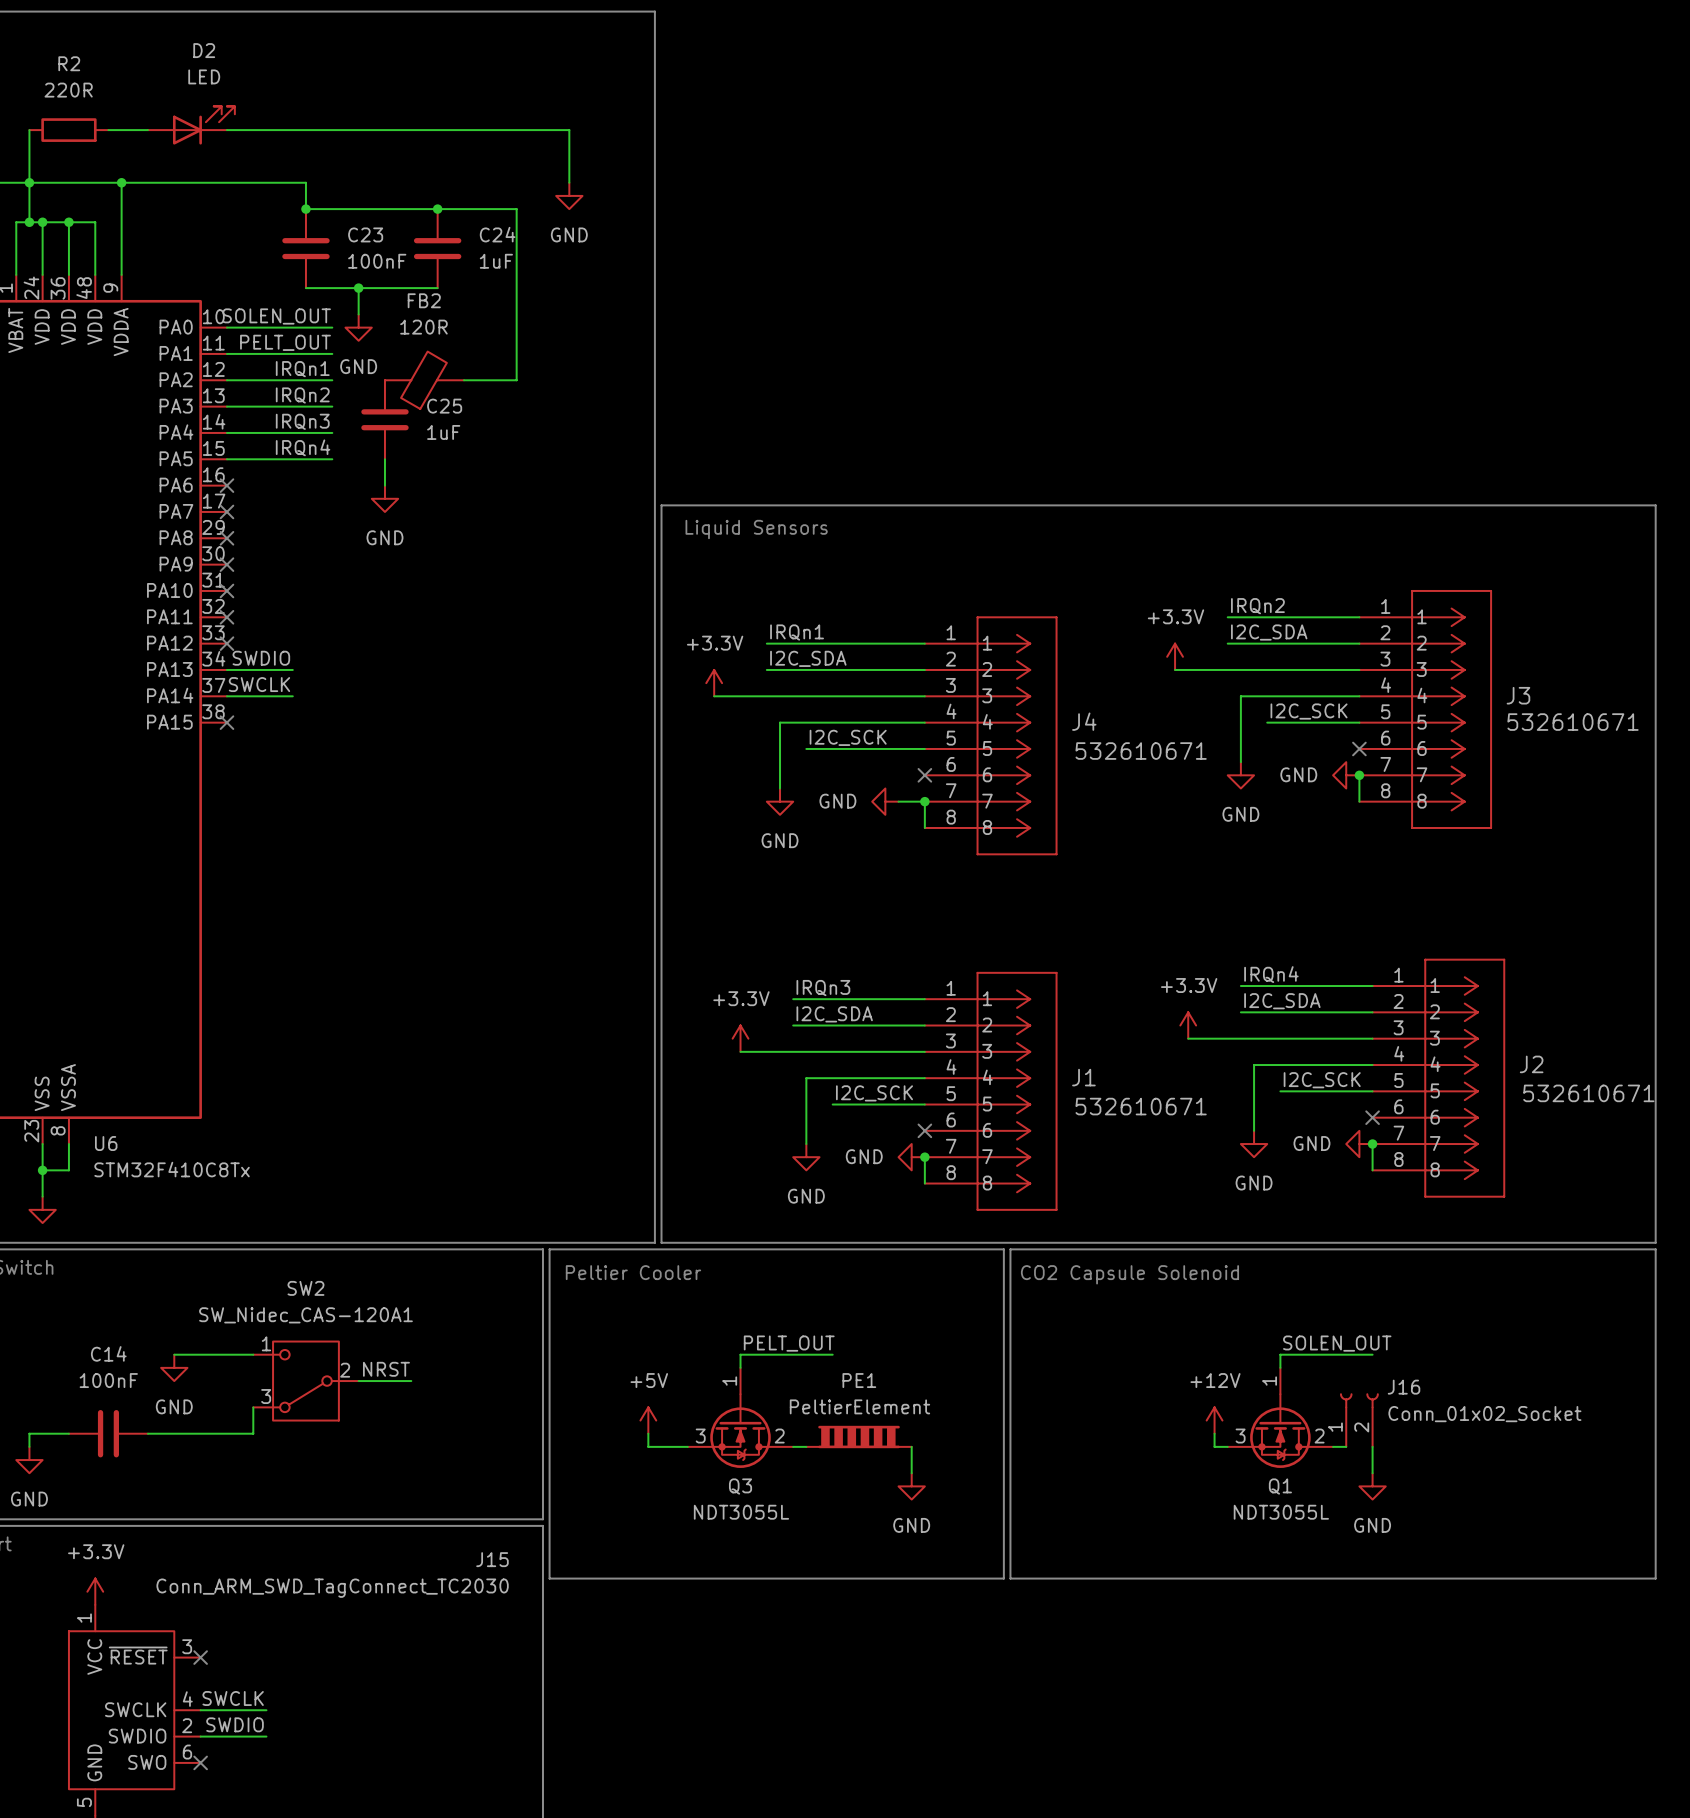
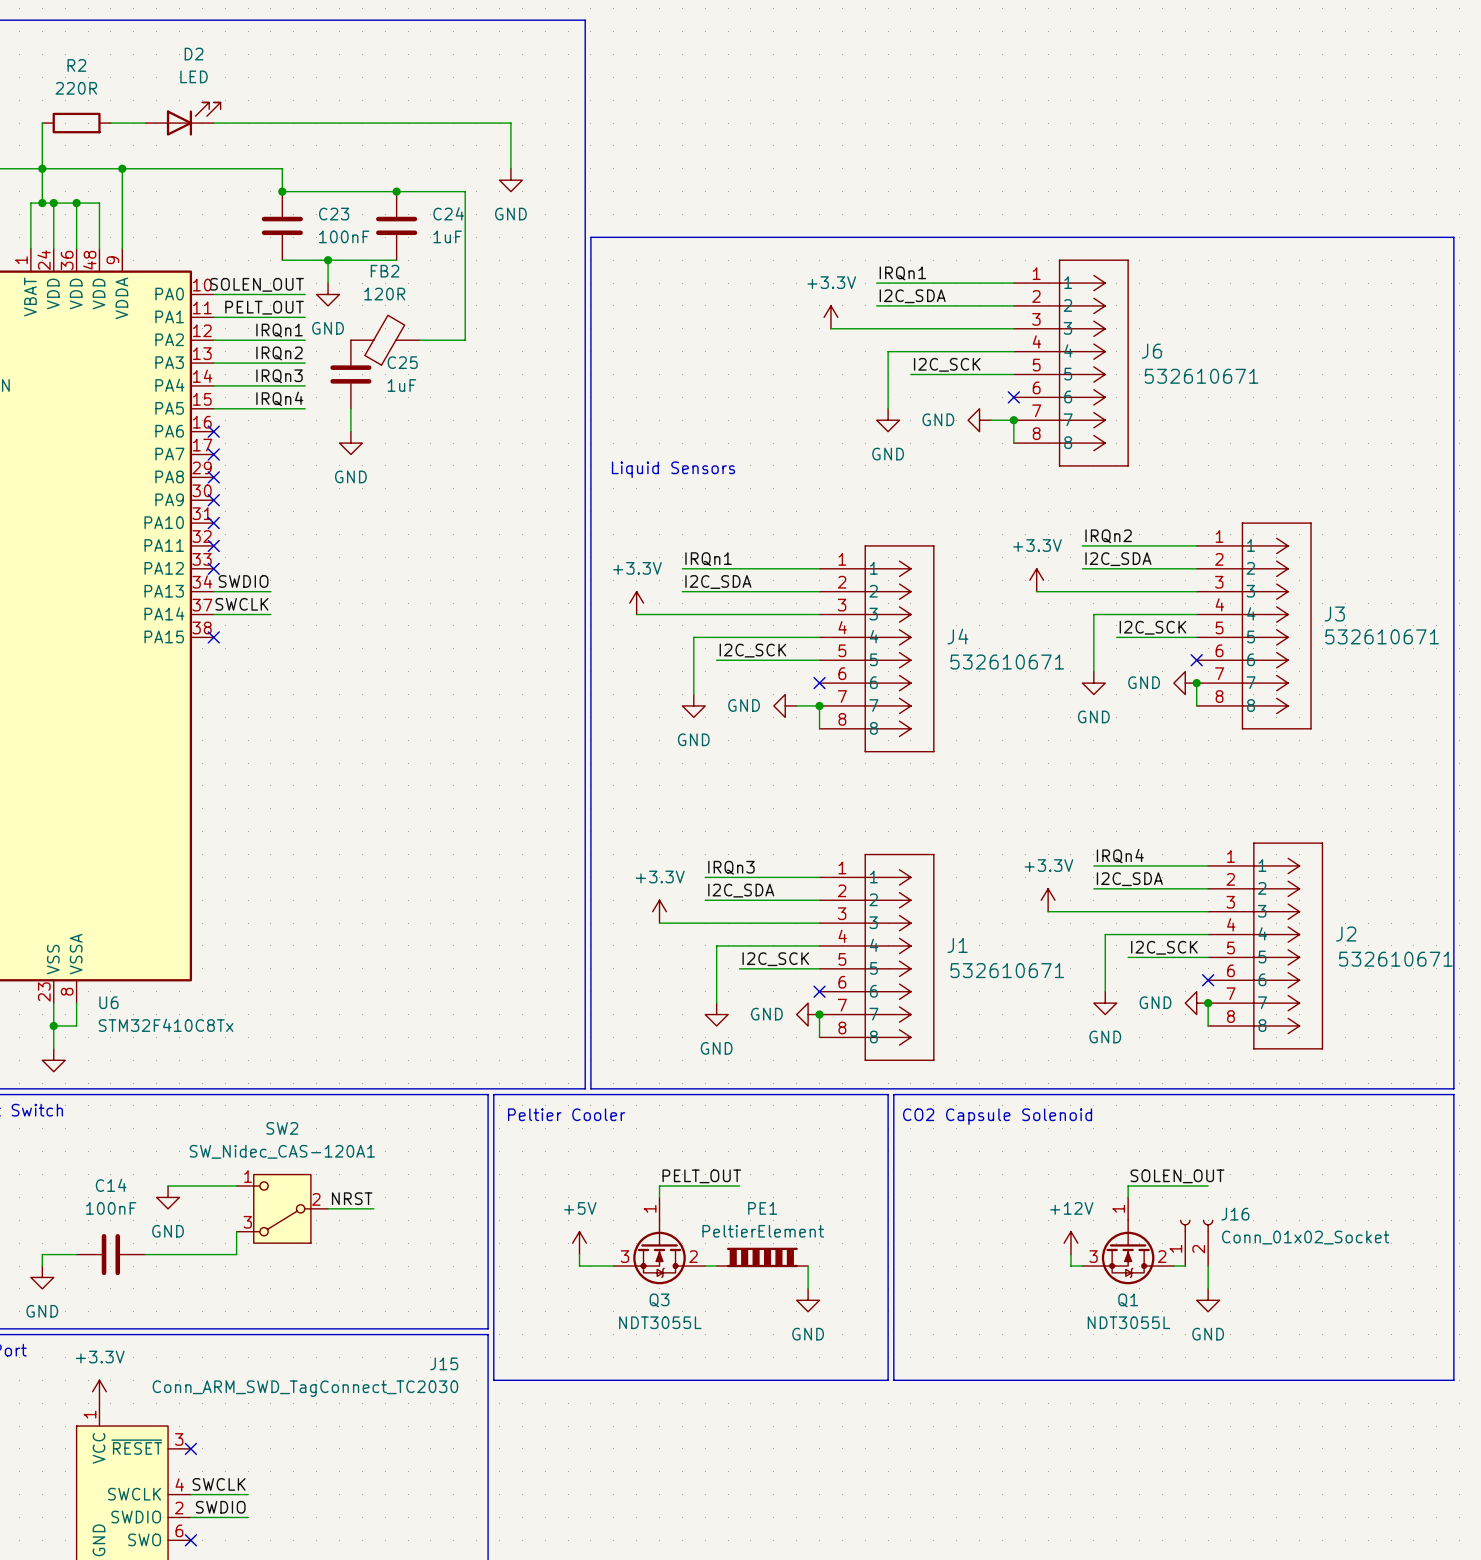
label: none -> IRQn1 (902, 273)
wire: none -> (876, 283) (1013, 283)
label: none -> I2C_SDA (912, 296)
wire: none -> (876, 305) (1013, 305)
power symbol: none -> +3.3V (830, 317)
wire: none -> (830, 328) (1013, 328)
wire: none -> (1013, 351) (888, 351) (888, 408)
J6: none -> 532610671 (1071, 363)
label: none -> I2C_SCK (947, 364)
wire: none -> (910, 374) (1013, 374)
no-connect mark: none -> (1013, 397)
power symbol: none -> GND (888, 420)
power symbol: none -> GND (979, 420)
wire: none -> (990, 420) (1013, 420) (1013, 443)
junction: none -> (1013, 420)
line: (661, 505) (1655, 505) -> (590, 448) (590, 237) (1453, 237) (1453, 448)

